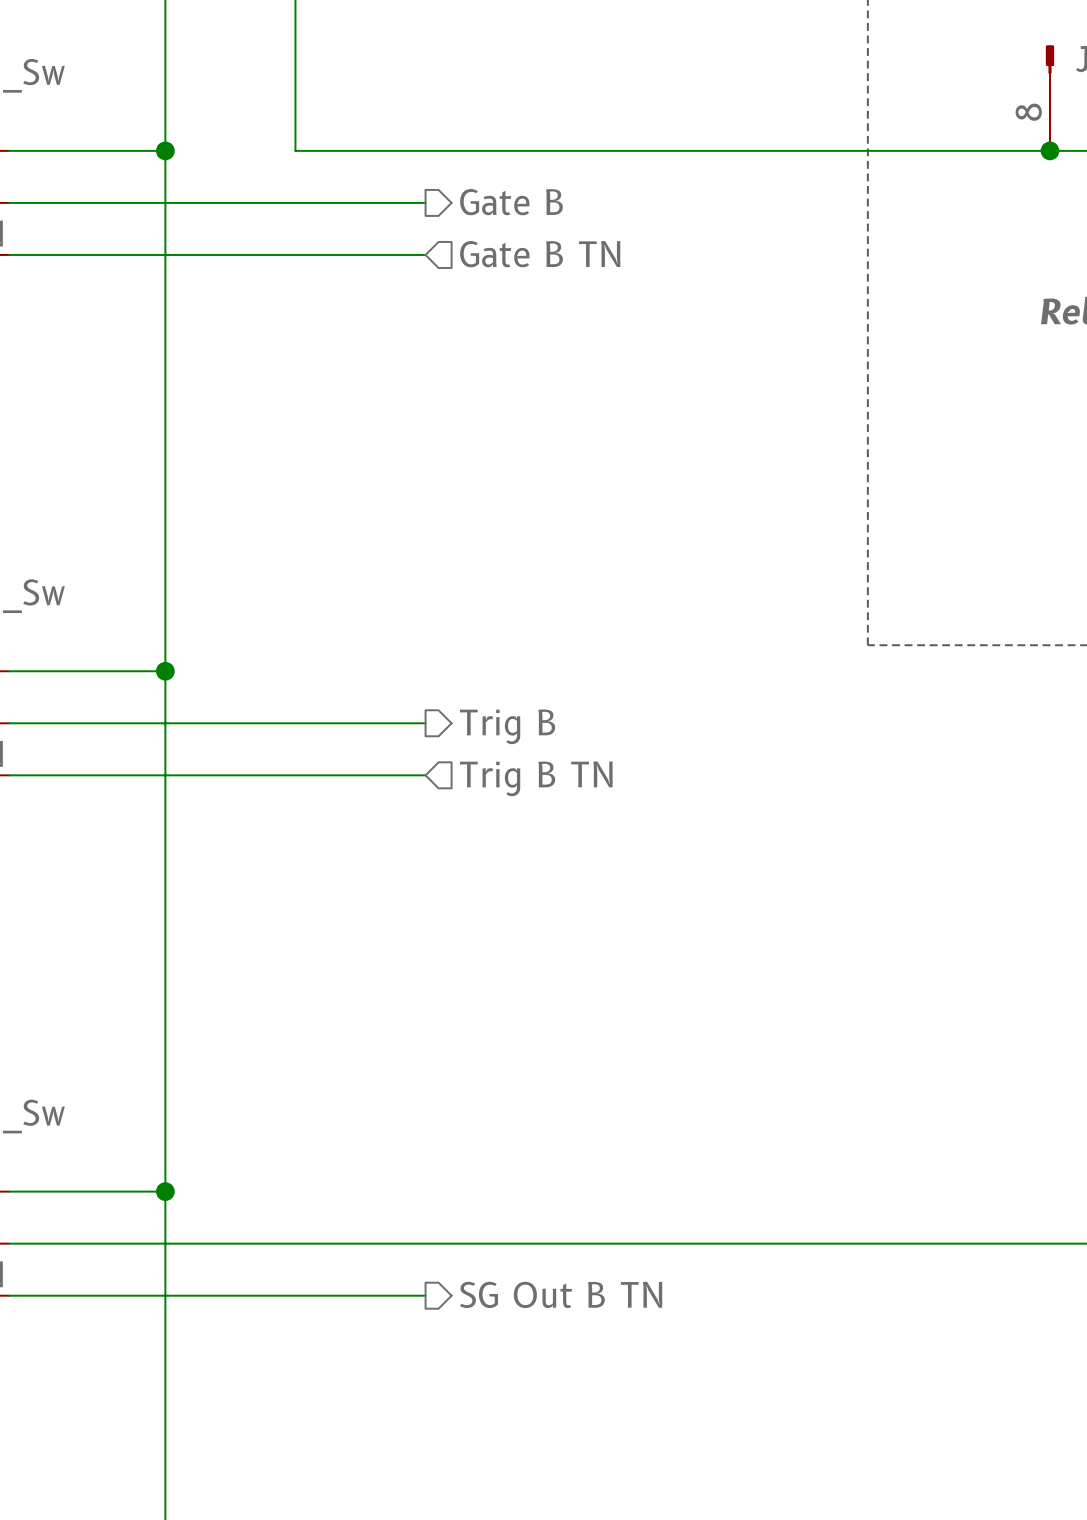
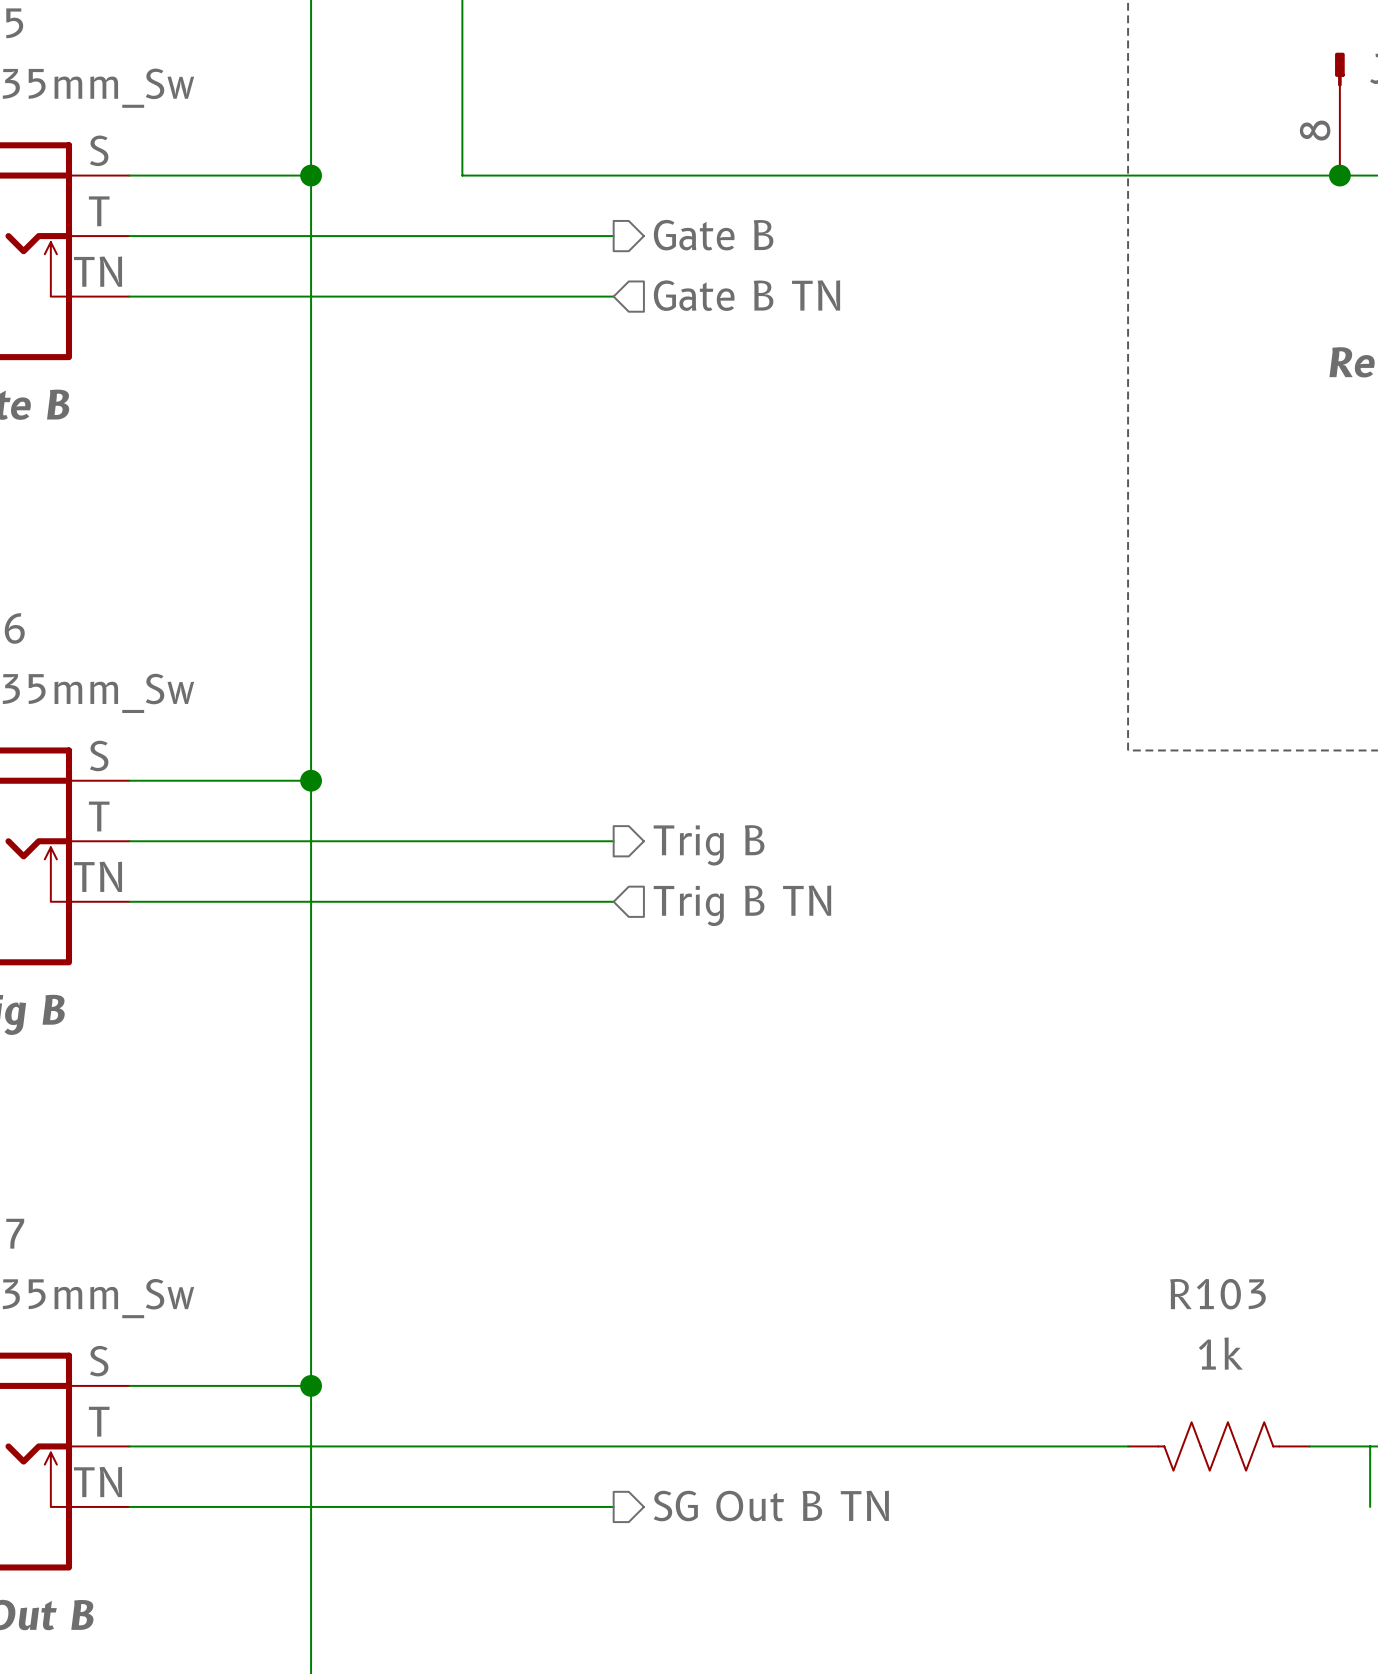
wire: (867, 1243) (1023, 1243) -> none
R103: none -> 1k (1218, 1446)
wire: none -> (1370, 1446) (1370, 1506)

